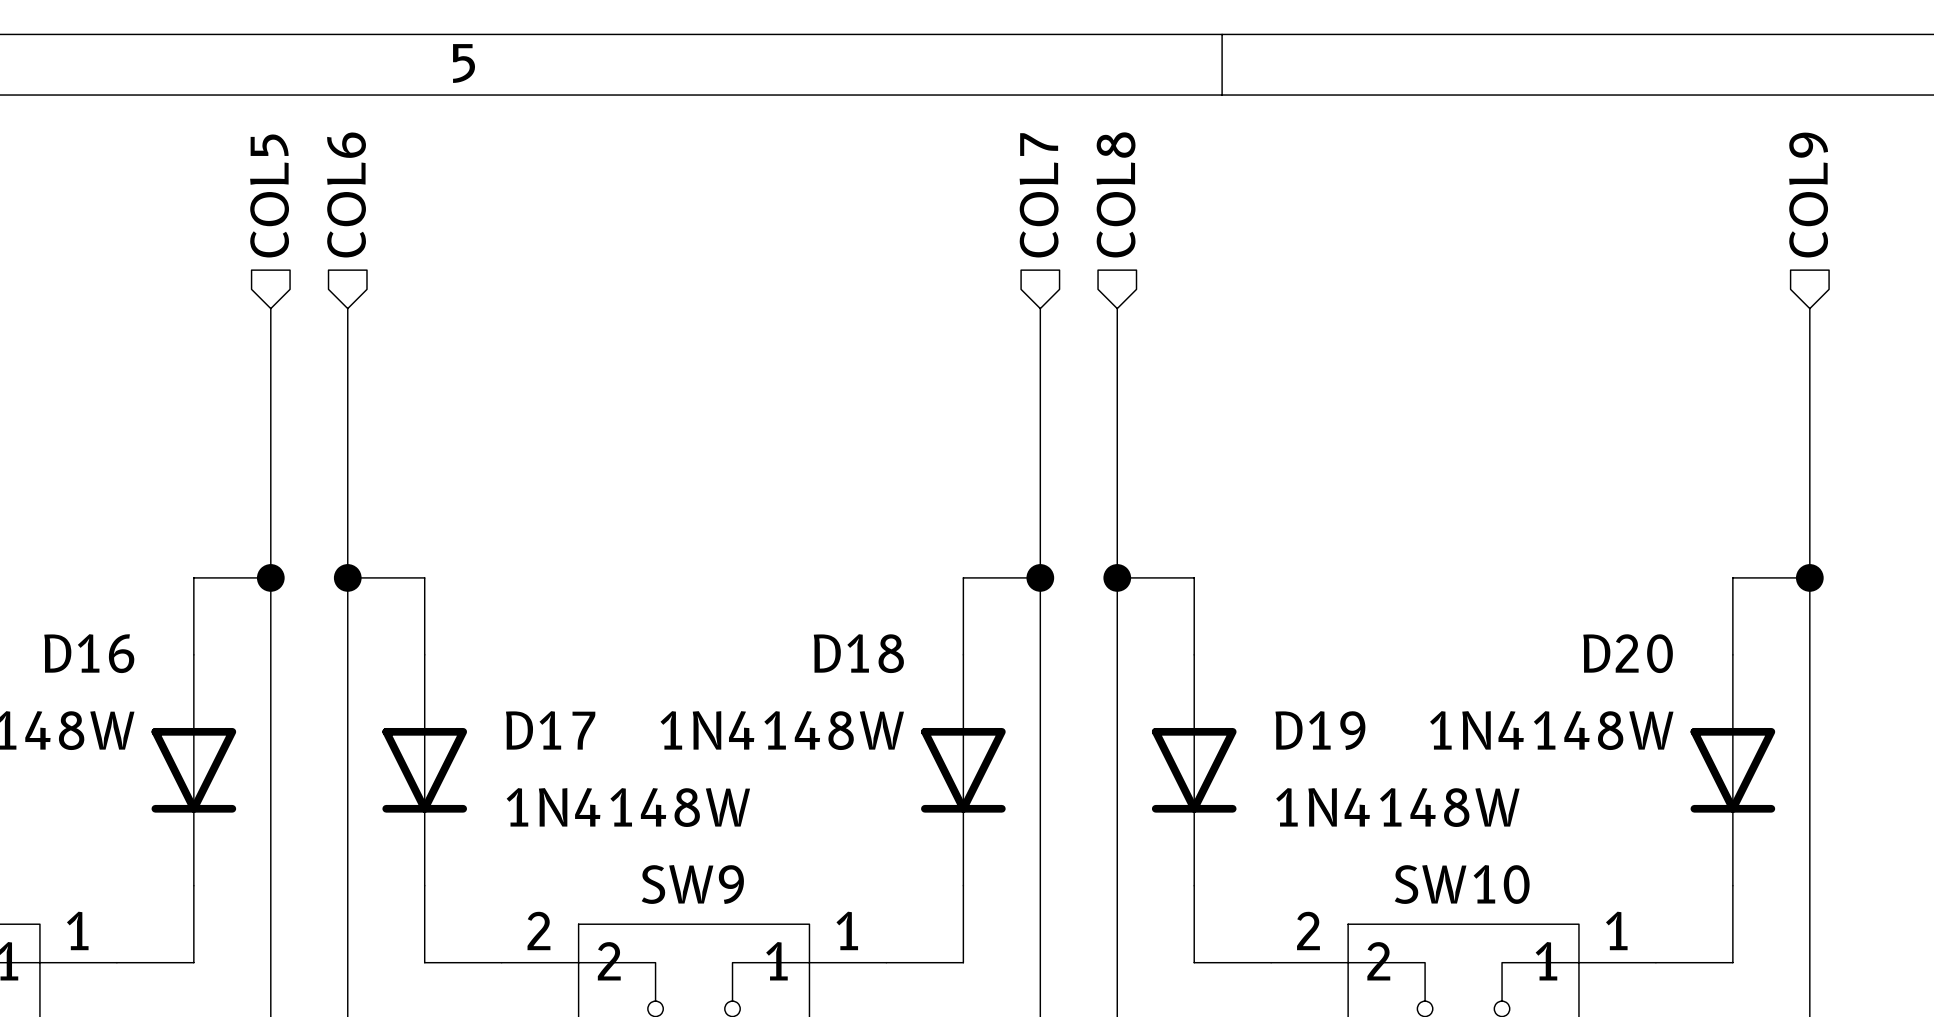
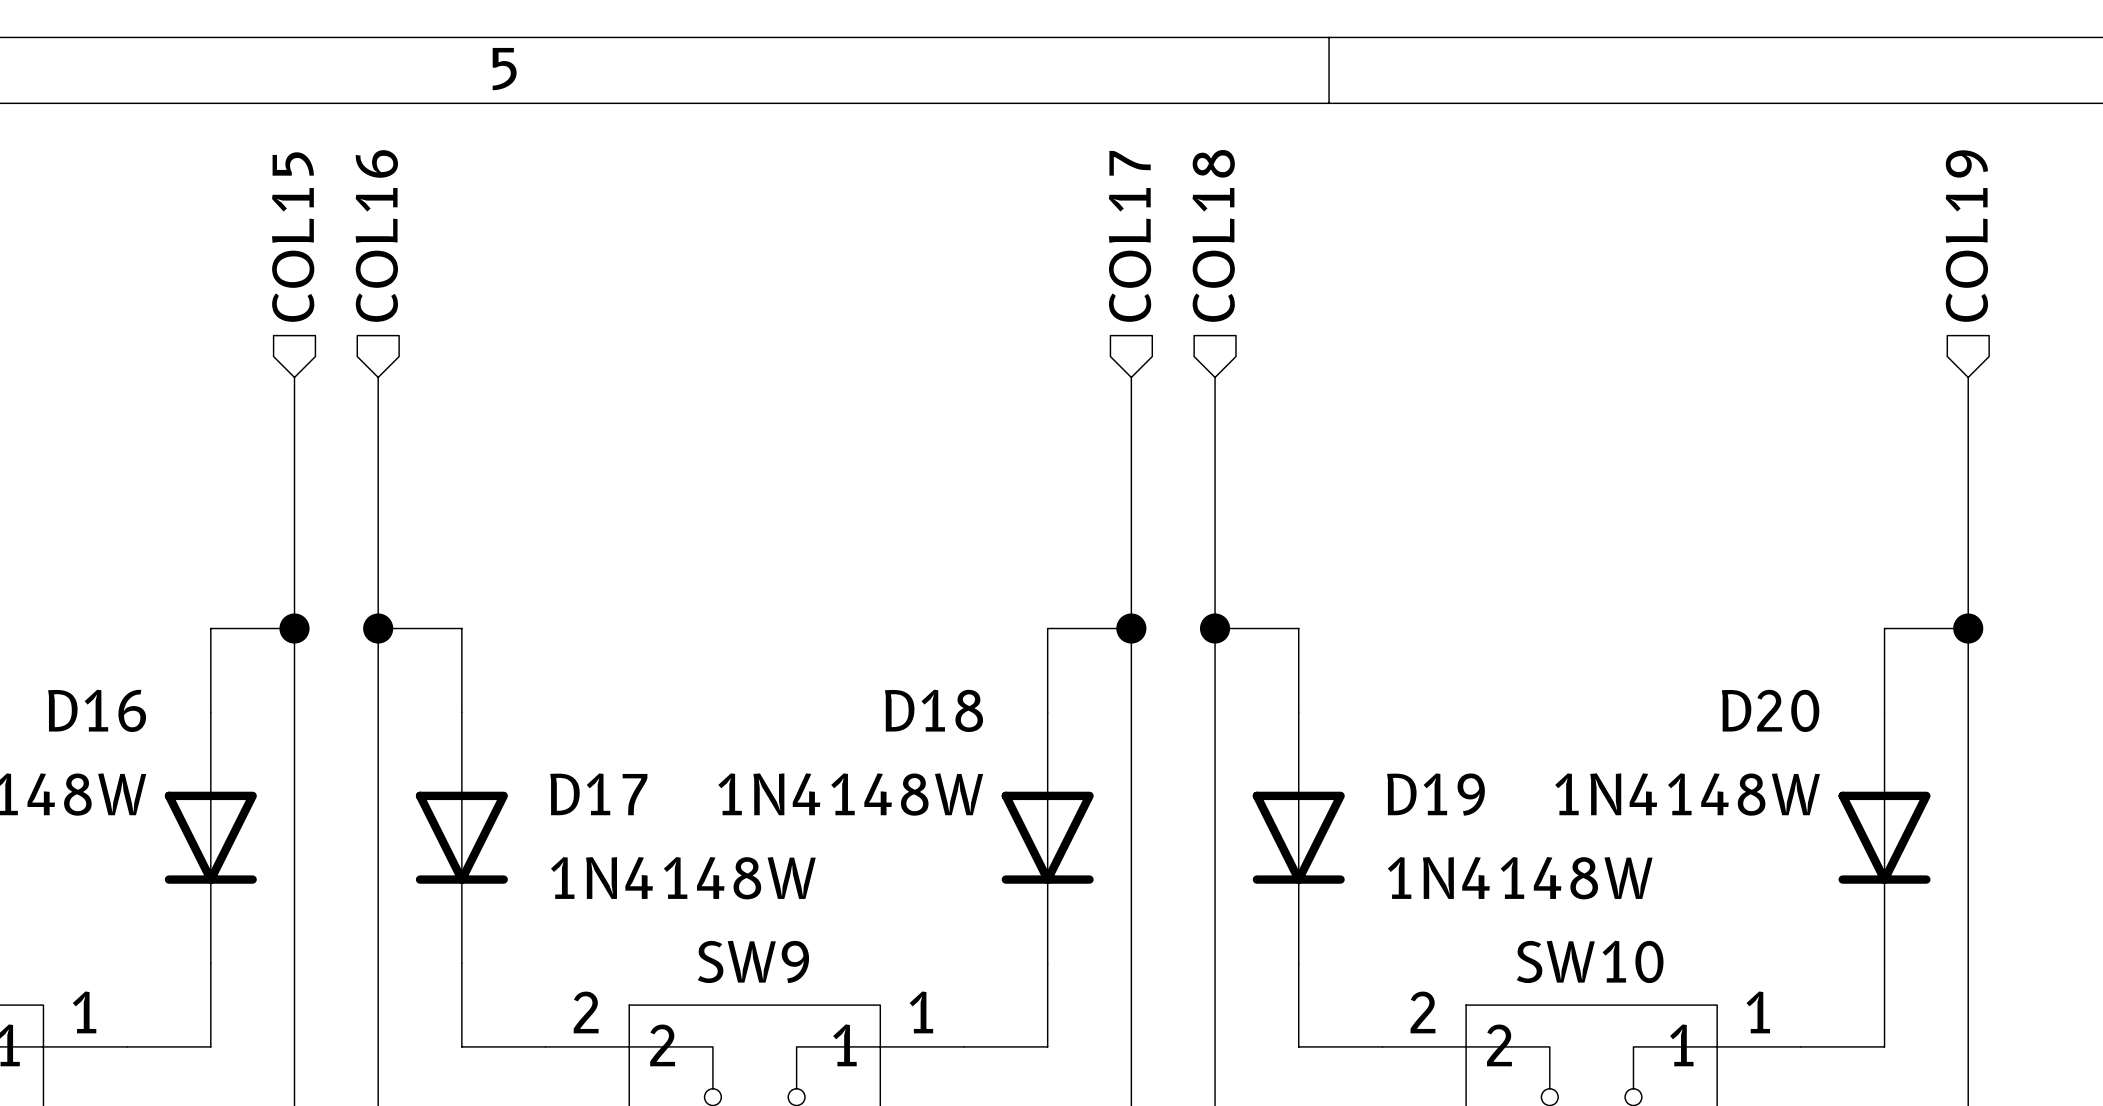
hierarchical label: COL6 (346, 194) -> COL16 (376, 236)
hierarchical label: COL8 (1116, 194) -> COL18 (1213, 235)
hierarchical label: COL5 (269, 195) -> COL15 (293, 237)
hierarchical label: COL7 (1039, 195) -> COL17 (1130, 236)
hierarchical label: COL9 (1808, 195) -> COL19 (1966, 236)
wire: (270, 308) (270, 347) -> none
wire: (347, 308) (347, 347) -> none
wire: (1040, 308) (1040, 347) -> none
wire: (1117, 308) (1117, 347) -> none
wire: (1809, 308) (1809, 347) -> none

